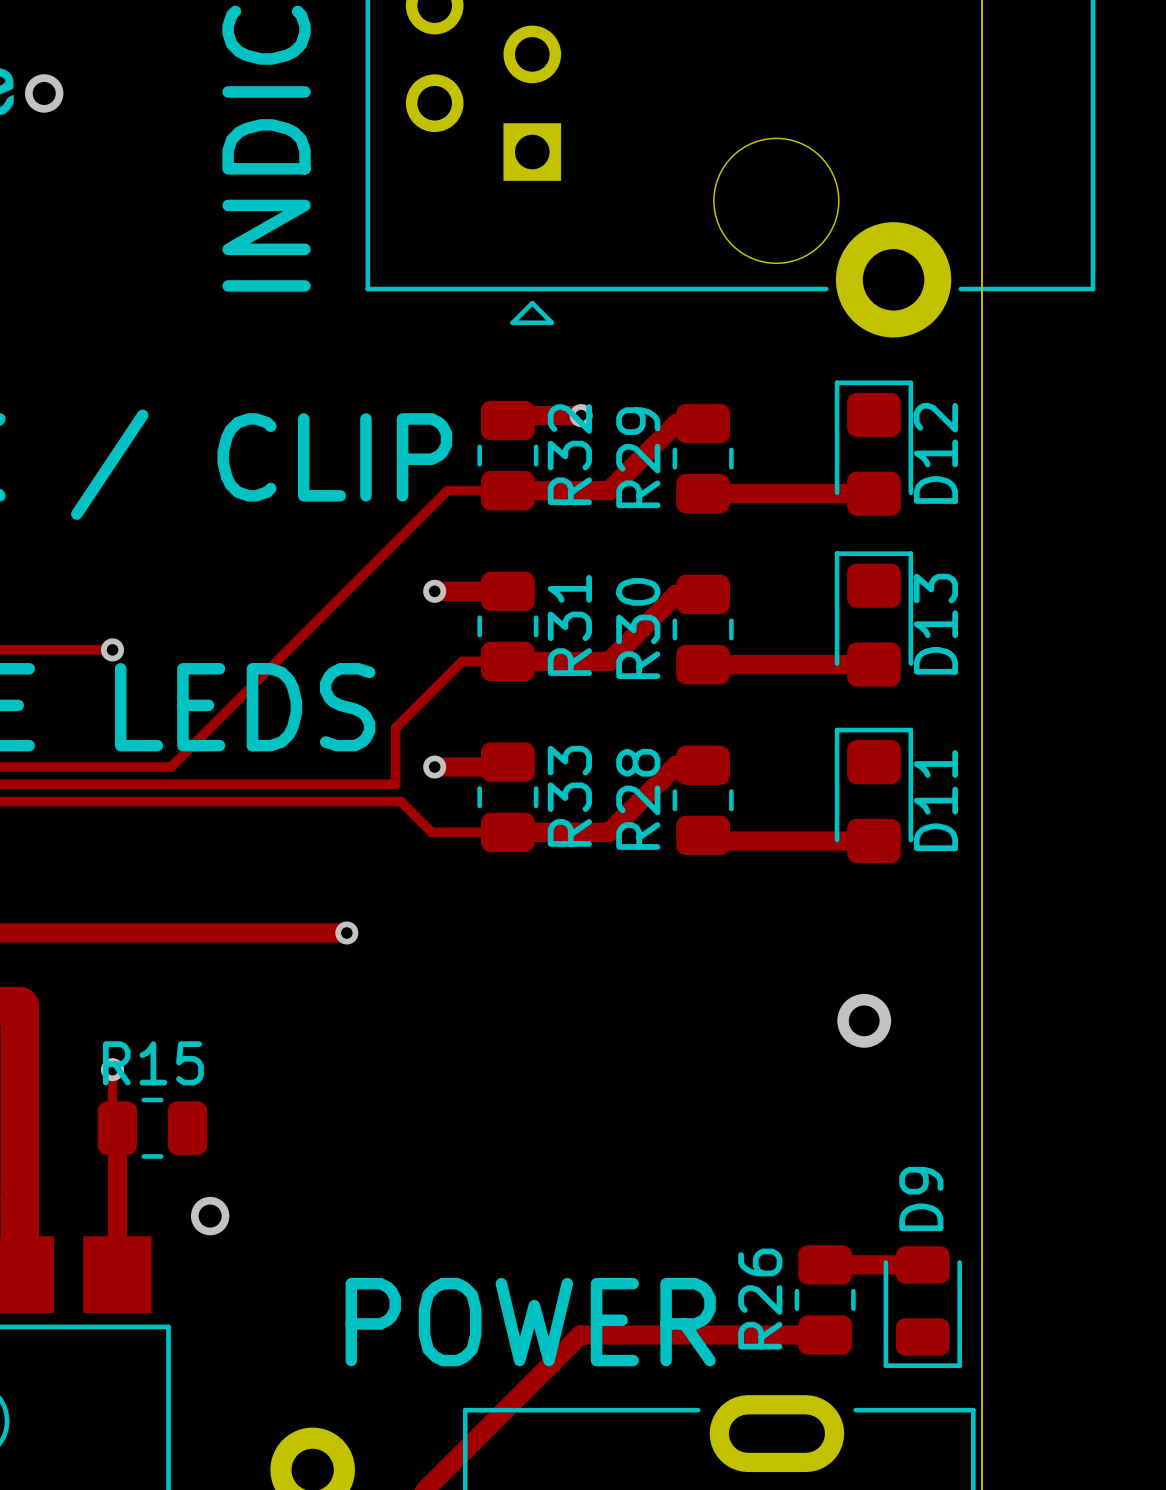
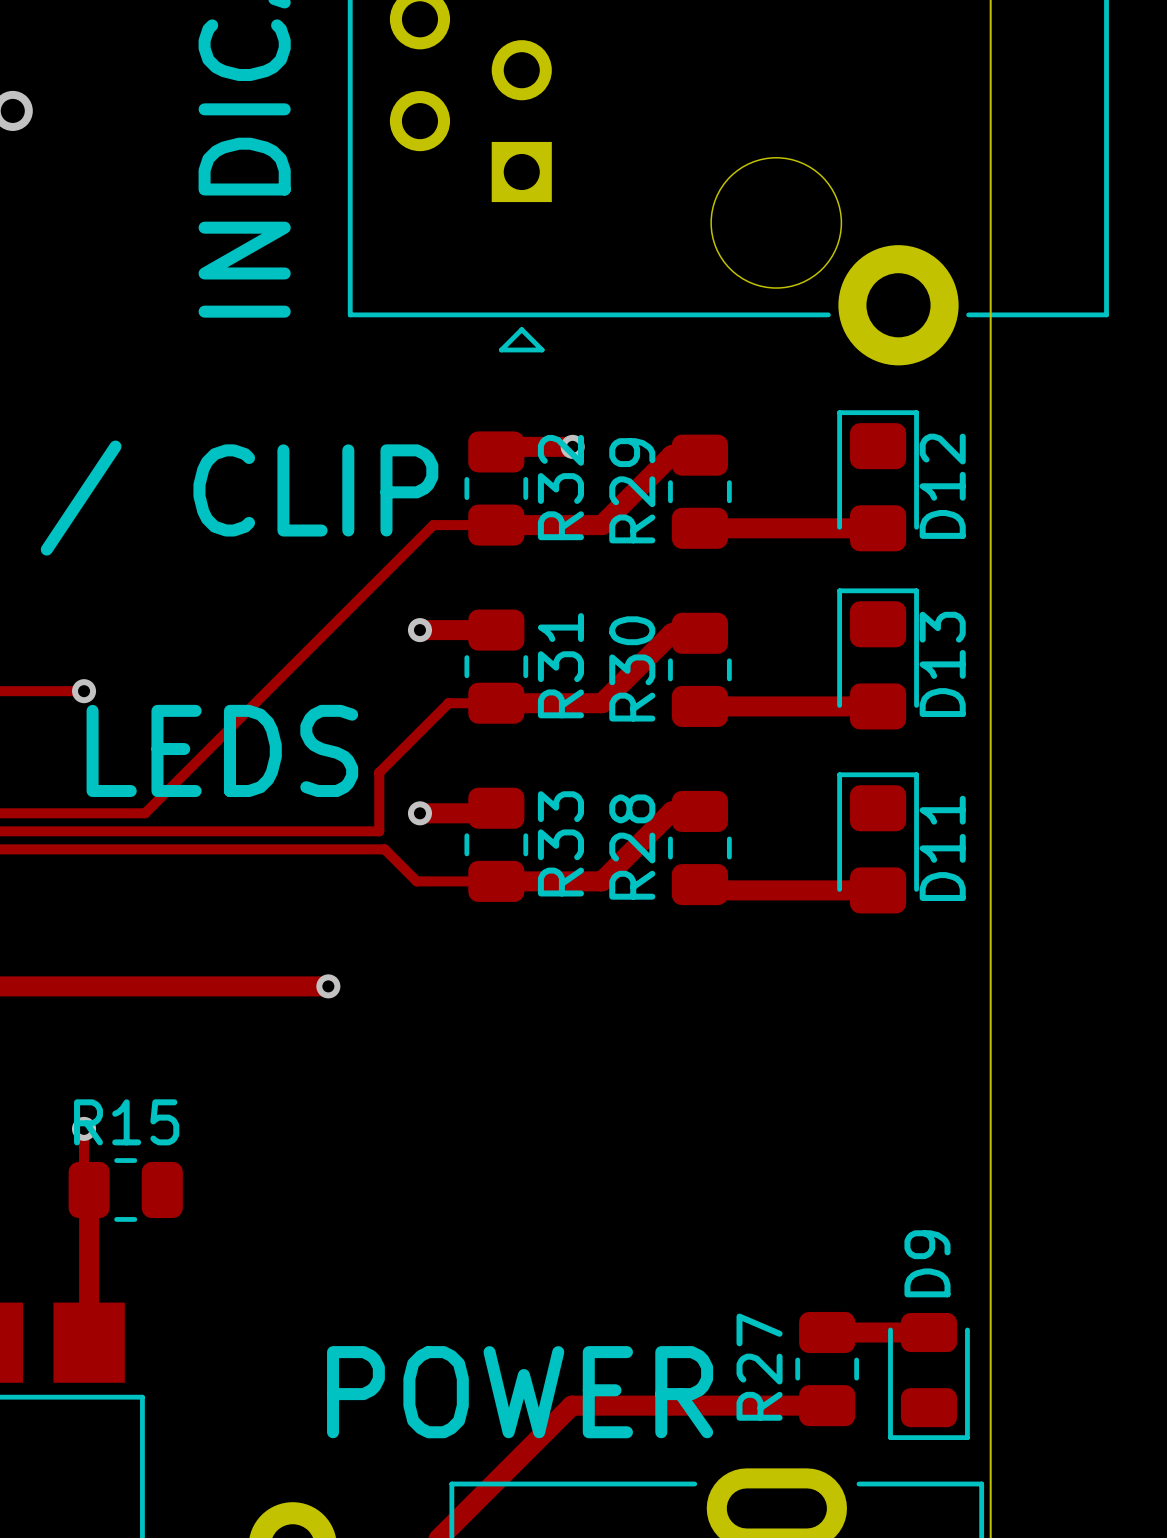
via: (864, 1020) -> none
via: (210, 1216) -> none
R26 name: R26 (760, 1299) -> R27 (759, 1367)

